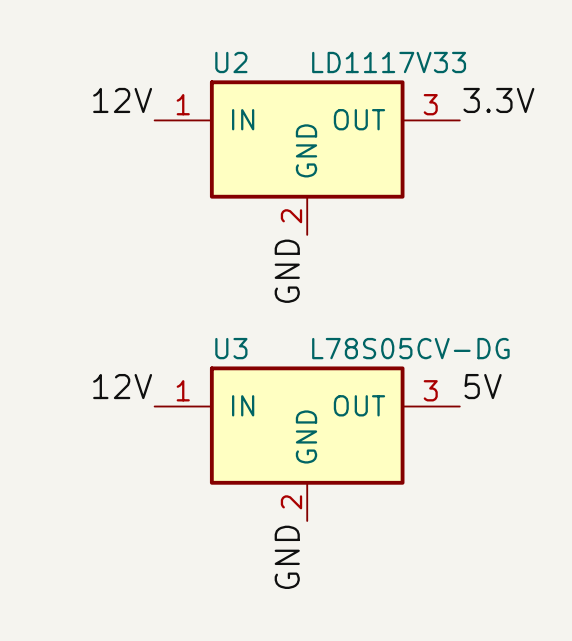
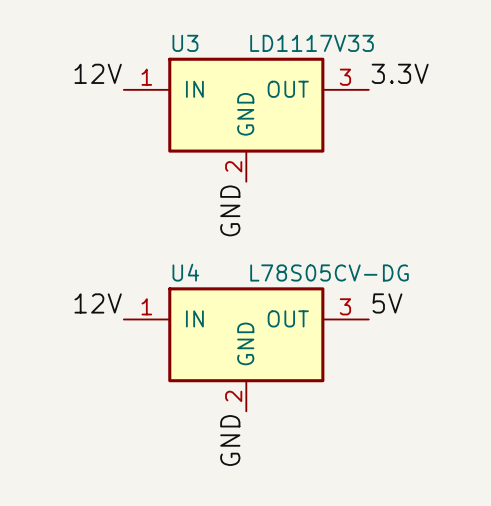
U2 name: U2 (231, 62) -> U3 (185, 43)
U3 name: U3 (231, 348) -> U4 (185, 272)

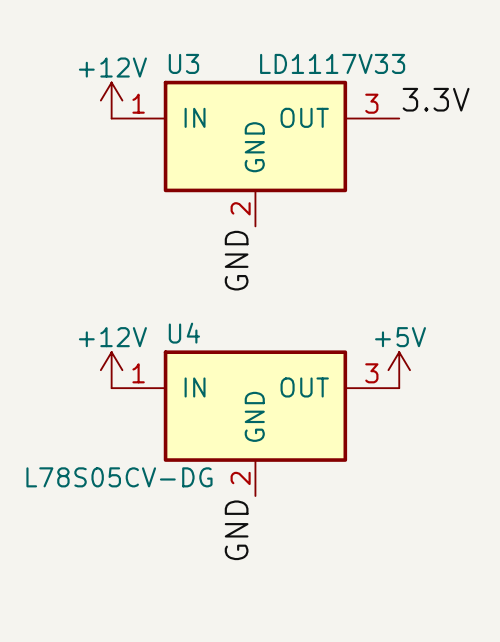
label: 12V (98, 73) -> none
power symbol: none -> +12V (111, 100)
U4 value position: L78S05CV-DG (329, 272) -> L78S05CV-DG (119, 477)
label: 12V (98, 303) -> none
label: 5V (387, 303) -> none
power symbol: none -> +12V (111, 370)
power symbol: none -> +5V (399, 370)

